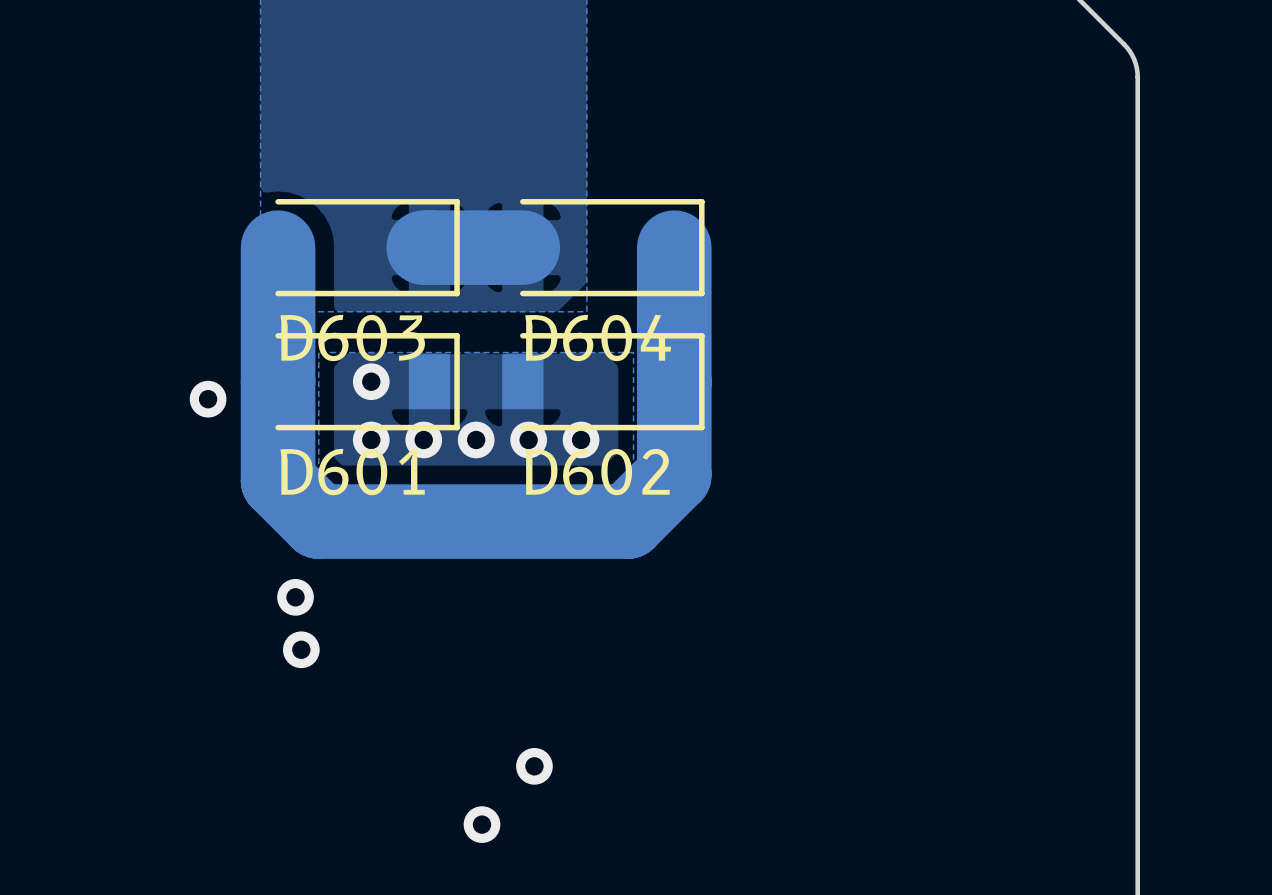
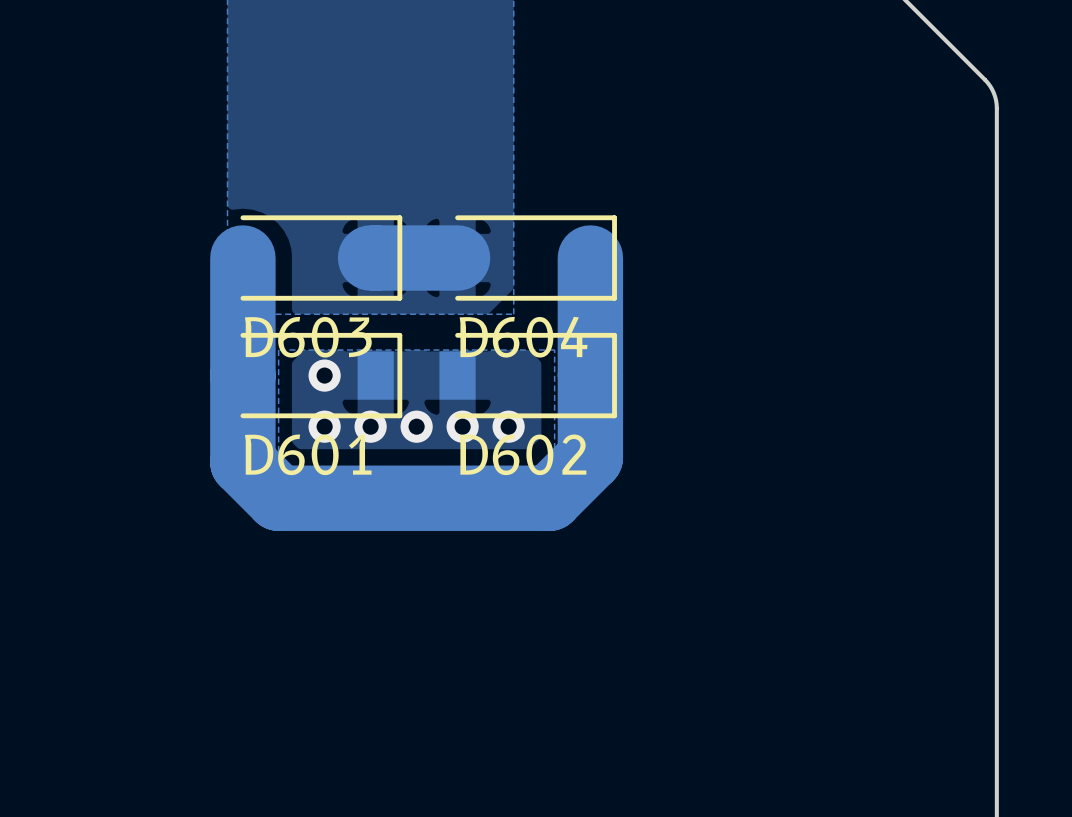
via: (208, 399) -> none
via: (295, 597) -> none
via: (301, 649) -> none
via: (534, 766) -> none
via: (482, 824) -> none

